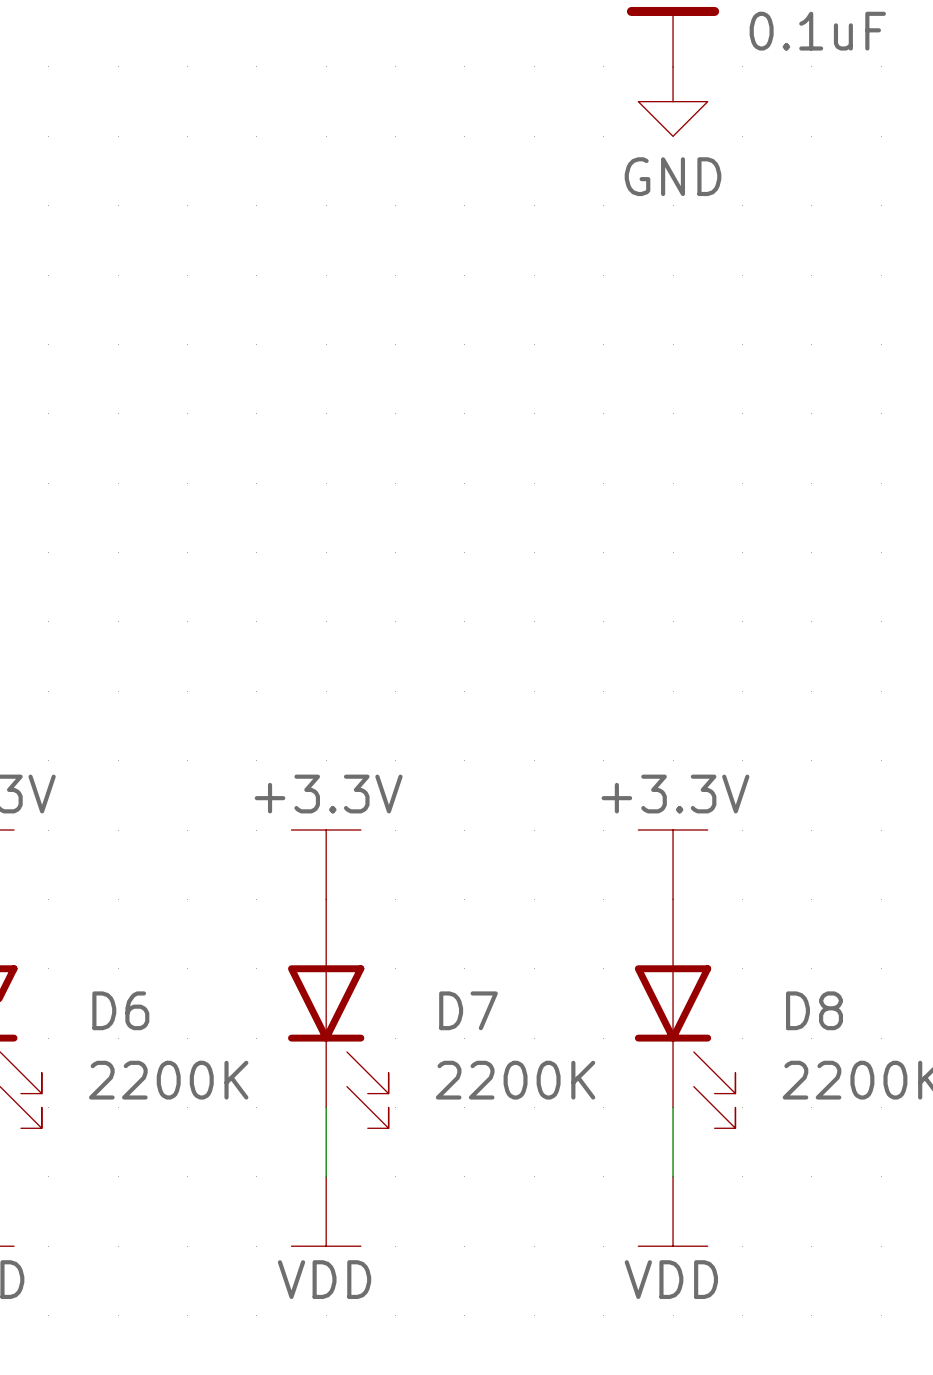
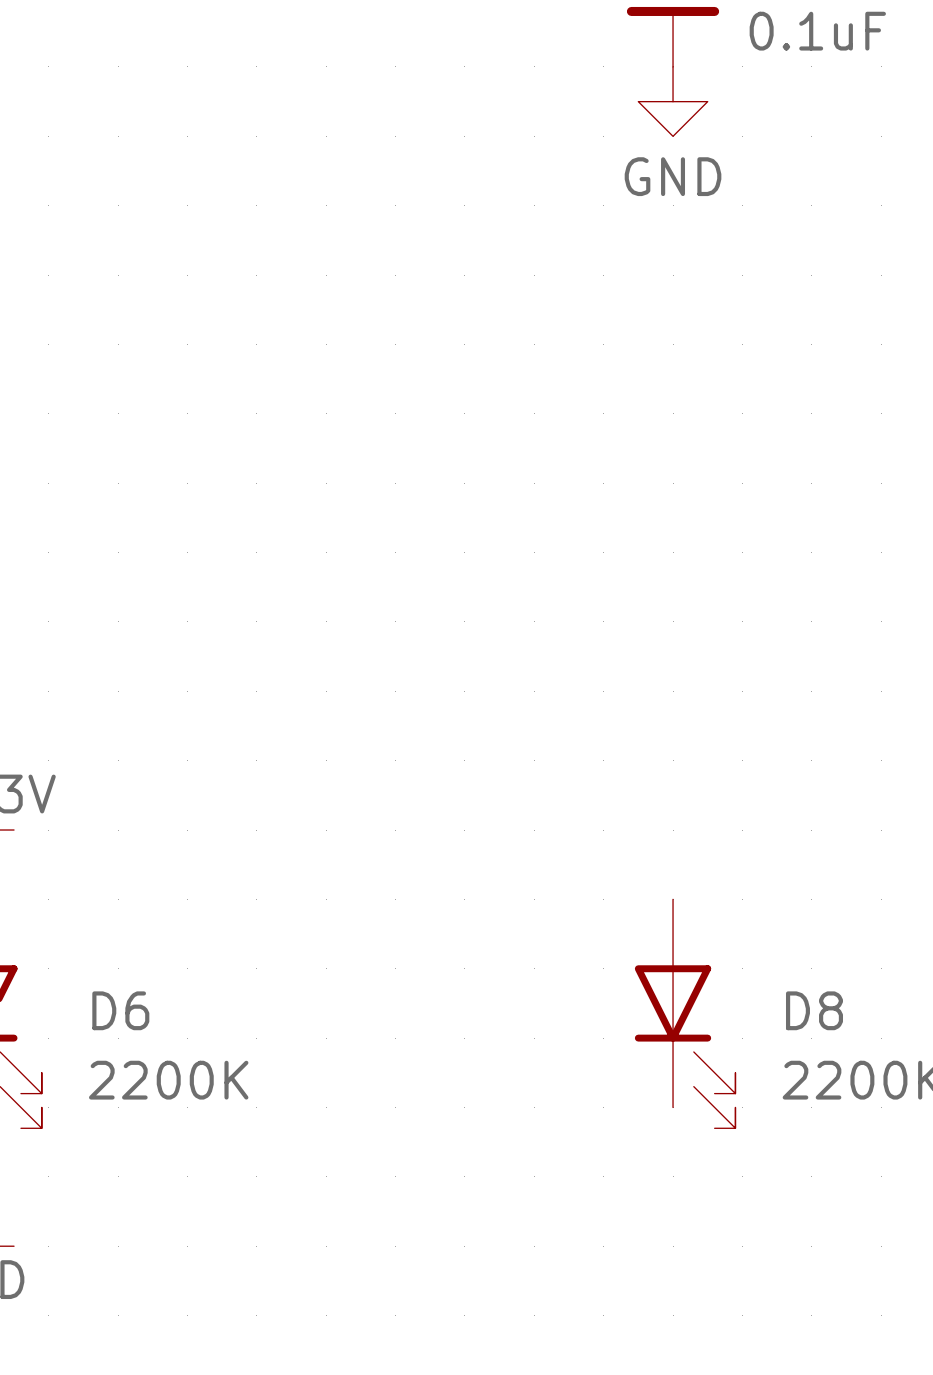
power symbol: +3.3V (326, 864) -> none
power symbol: +3.3V (673, 864) -> none
D7: 2200K (338, 1013) -> none
wire: (326, 1107) (326, 1176) -> none
wire: (673, 1107) (673, 1176) -> none
power symbol: VDD (326, 1211) -> none
power symbol: VDD (673, 1211) -> none

